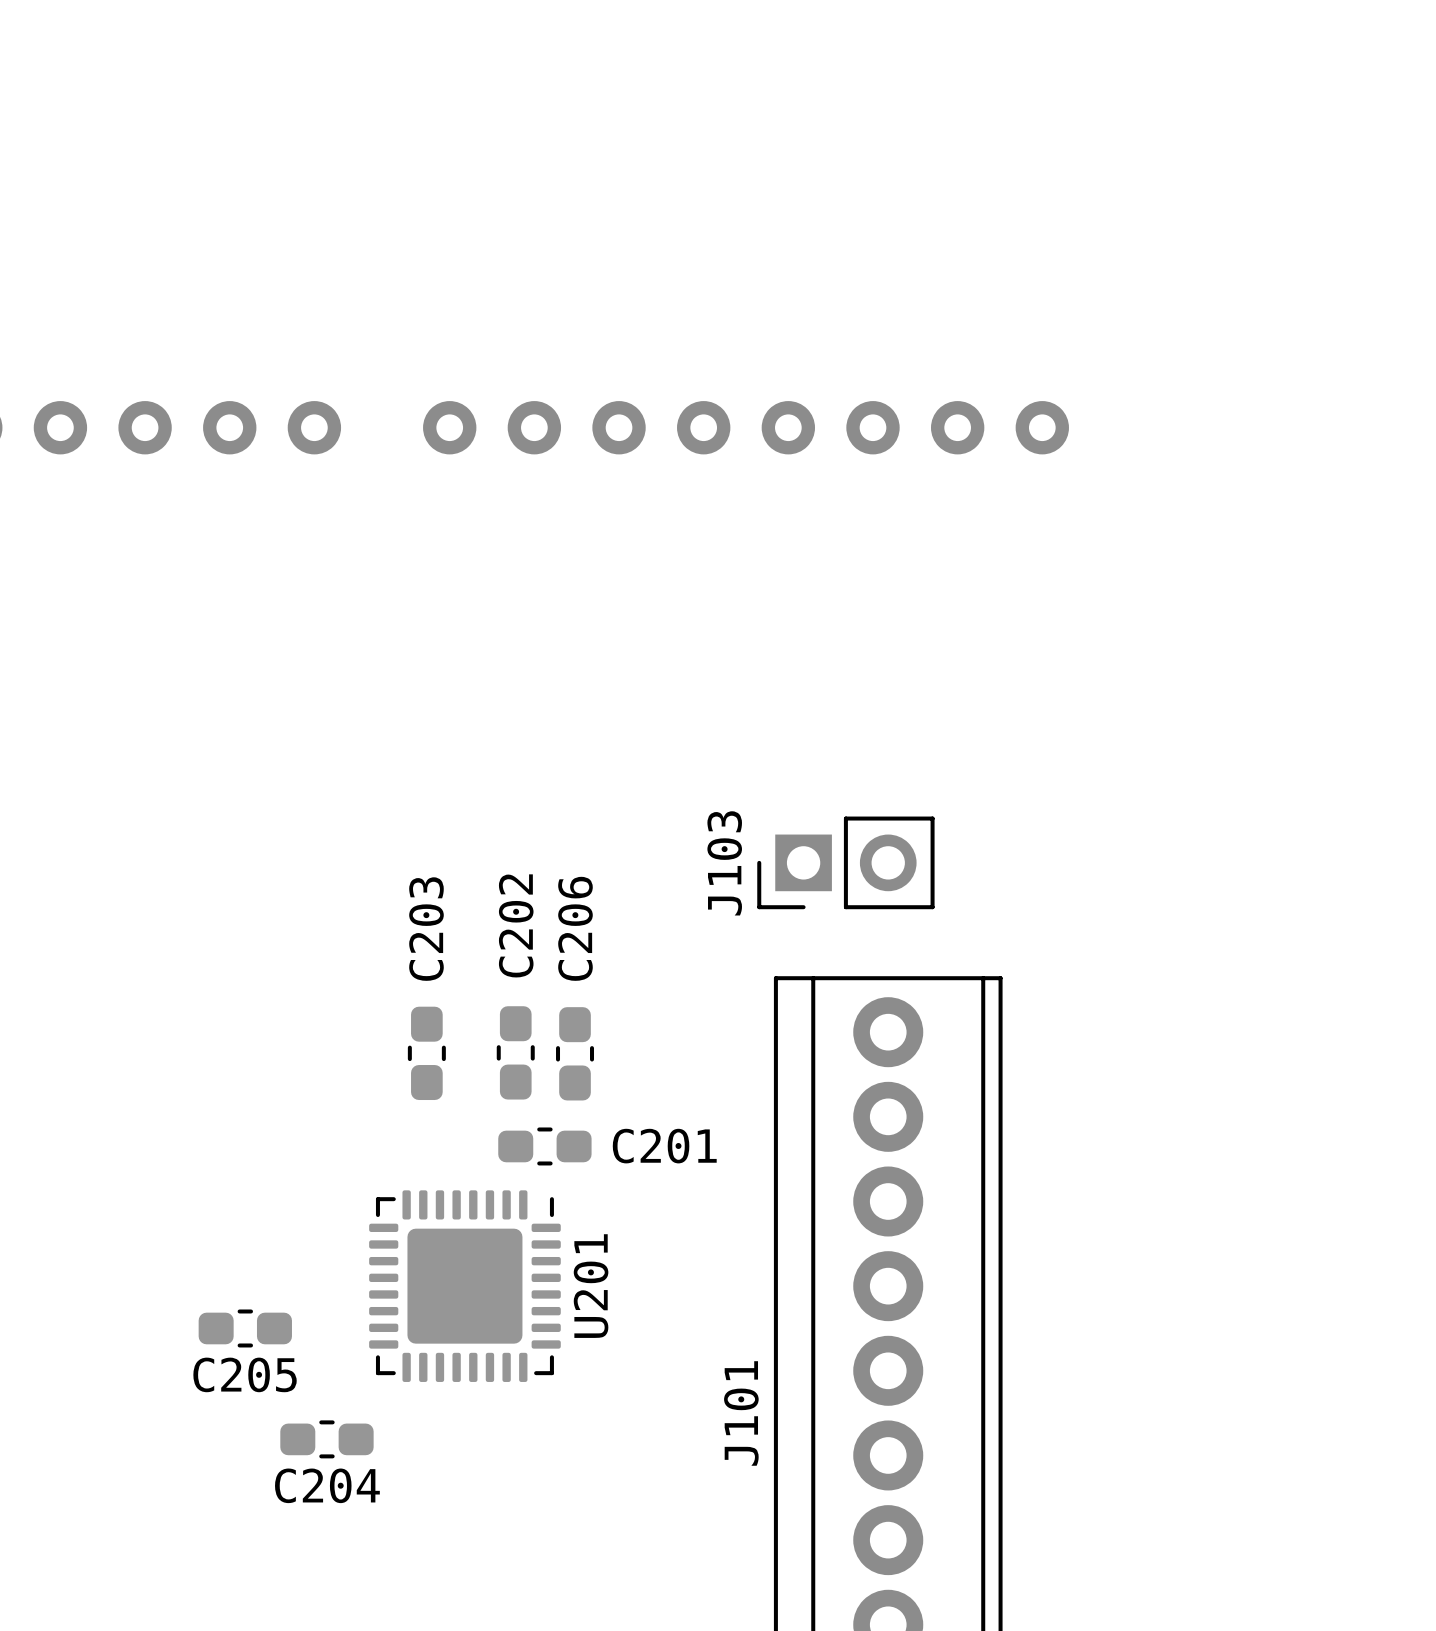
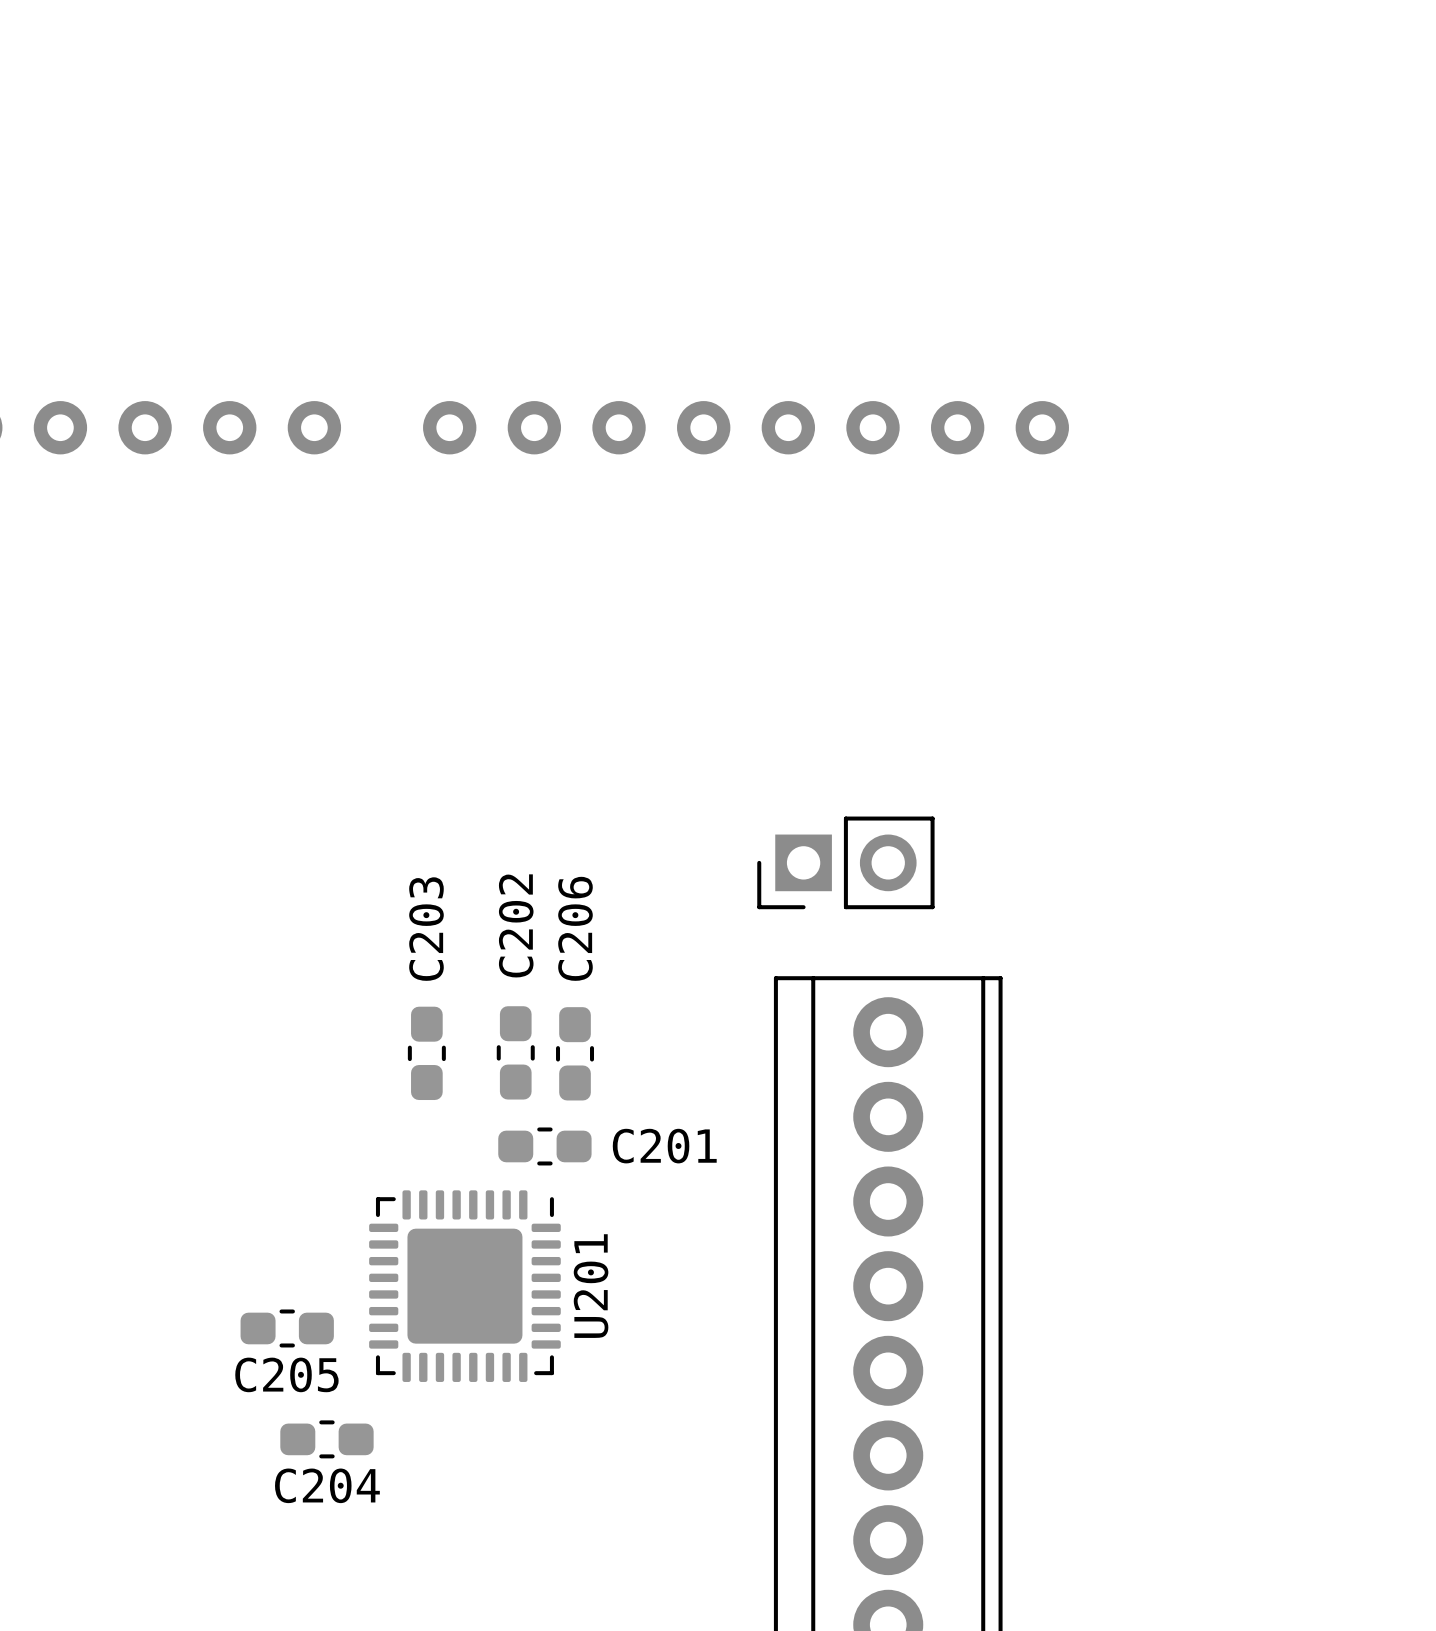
J103 name: J103 (724, 863) -> none
C205 position: (245, 1328) -> (287, 1328)
J101 name: J101 (741, 1413) -> none

